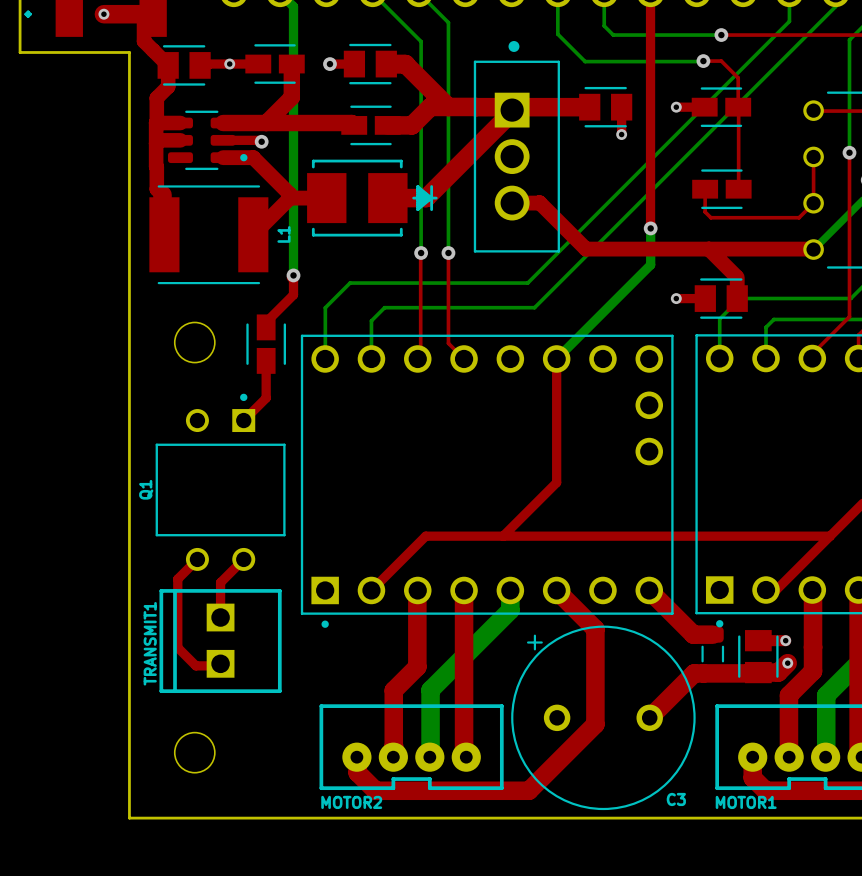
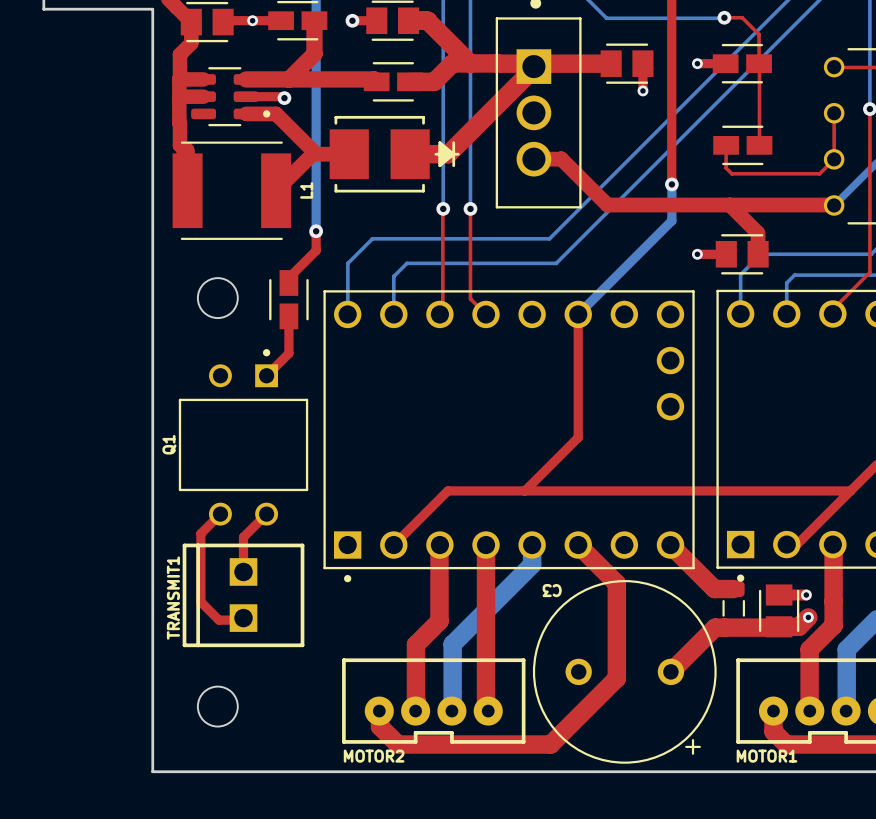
C3 rotation: 0° (603, 717) -> 180° (624, 671)

